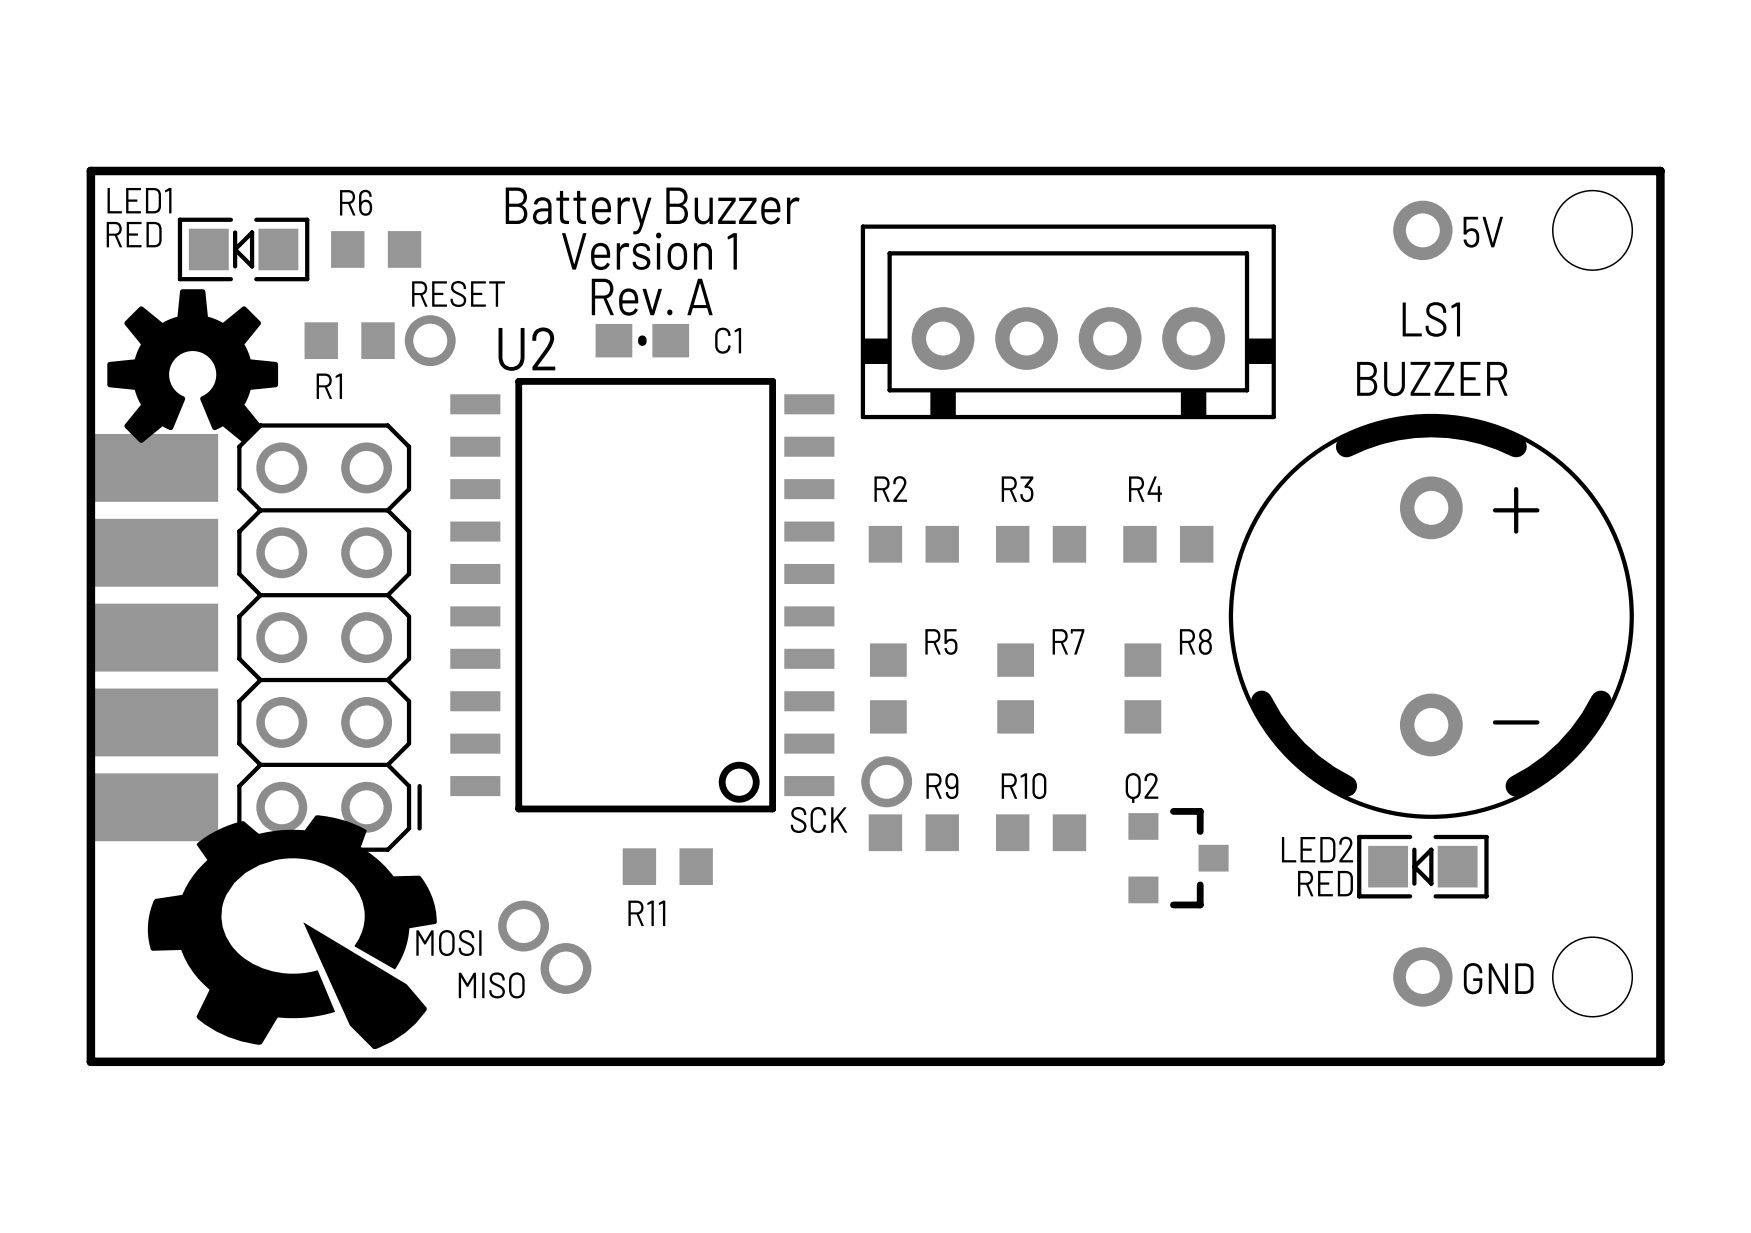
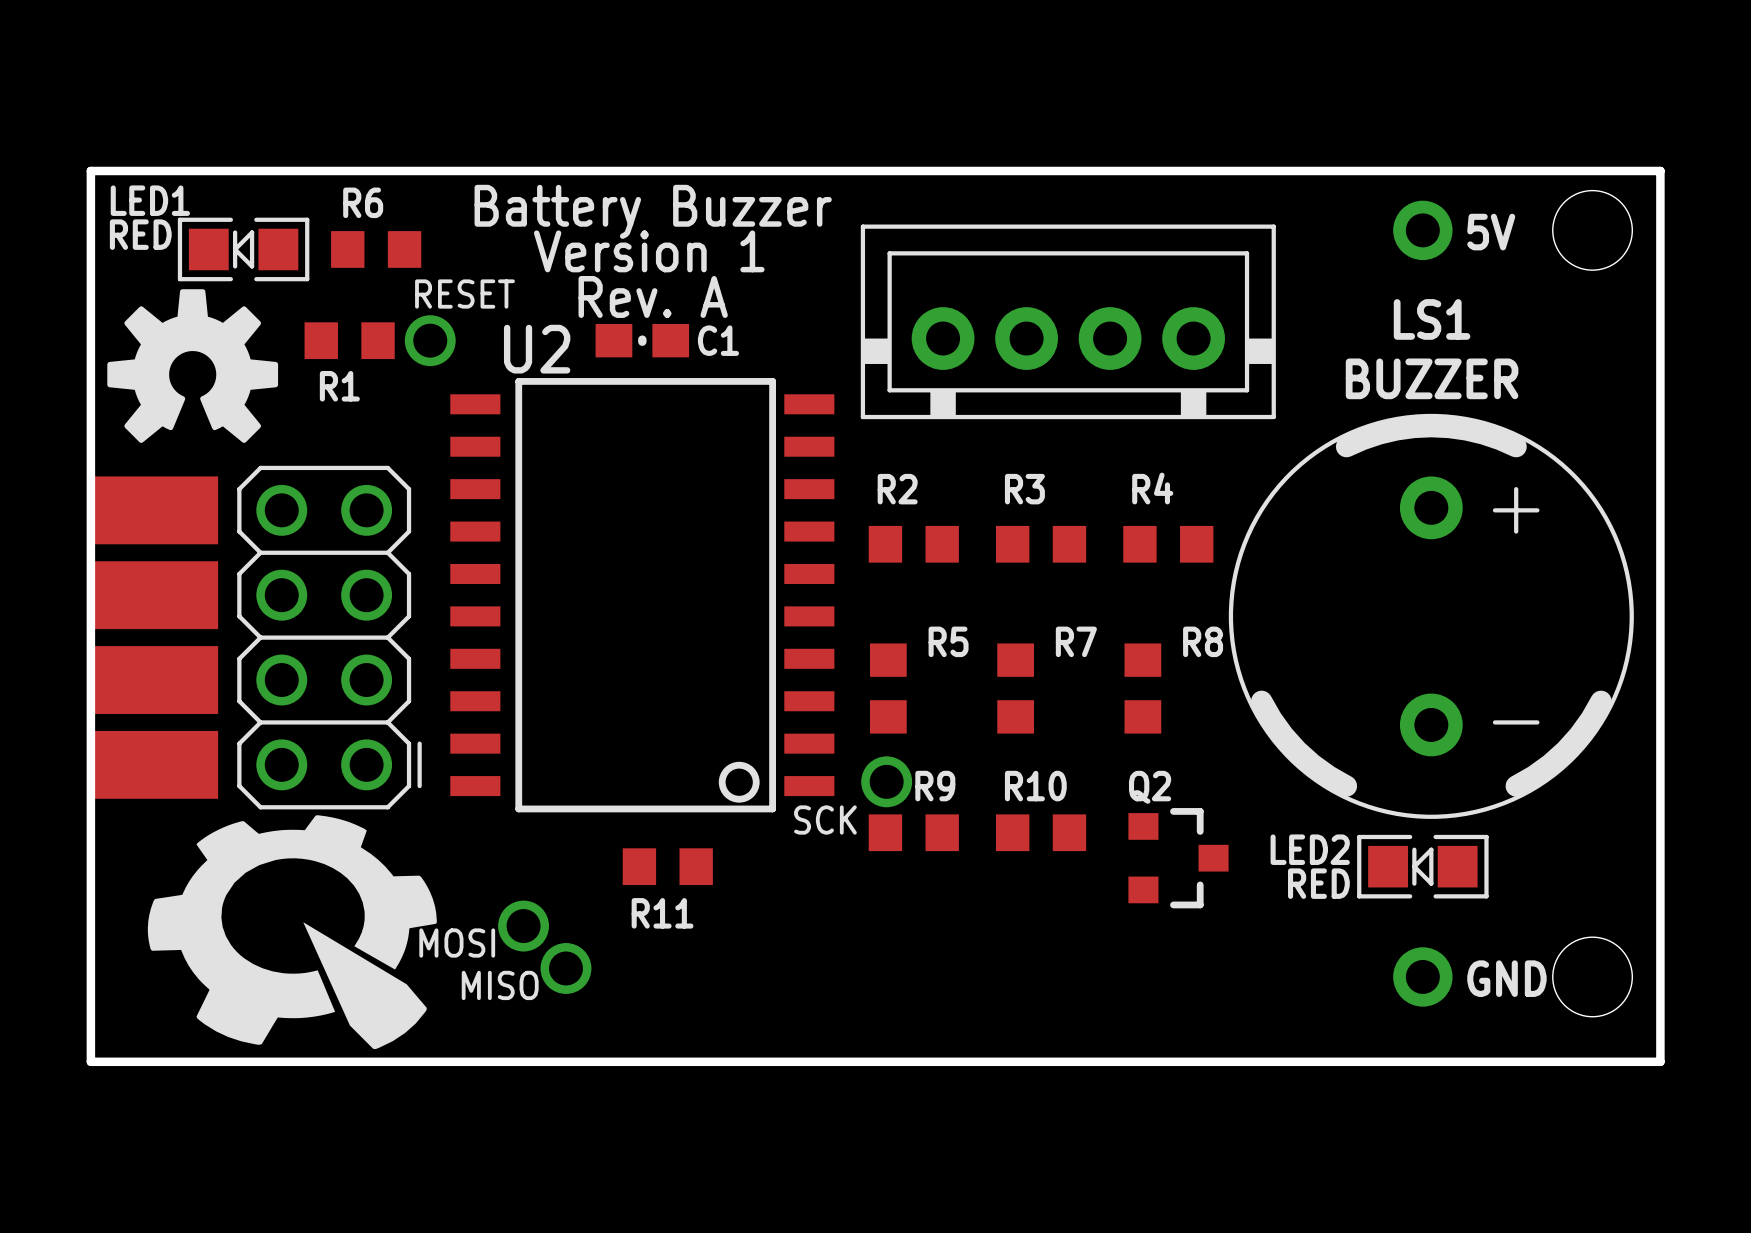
part footprint: [237, 423, 422, 852] -> [237, 465, 422, 810]
part footprint: [90, 433, 219, 842] -> [90, 476, 219, 799]

